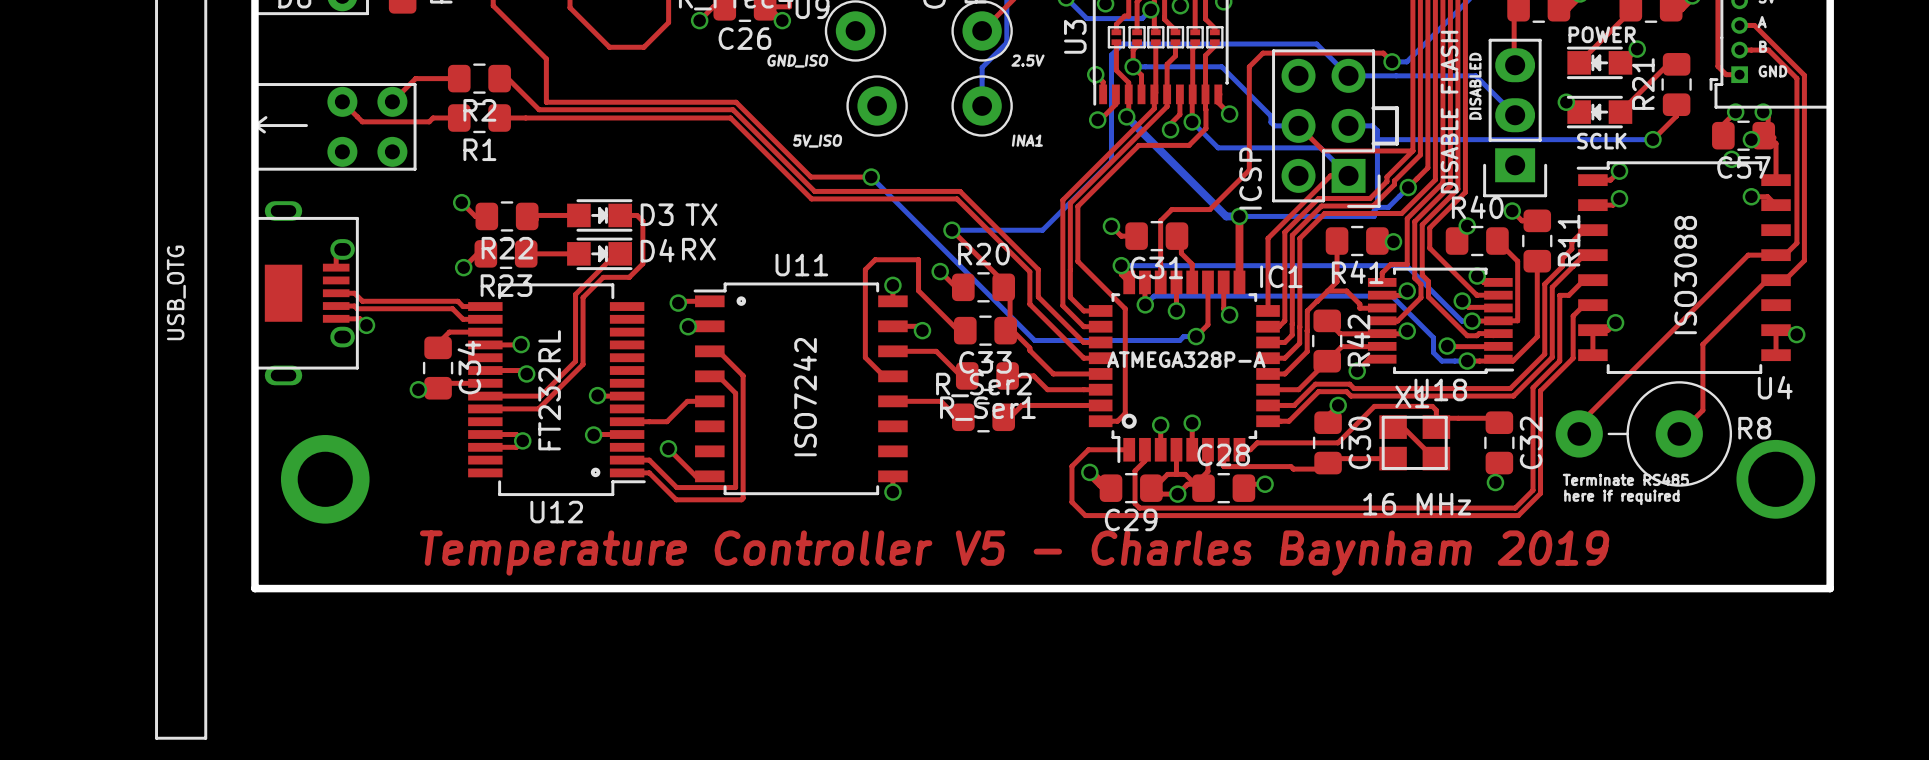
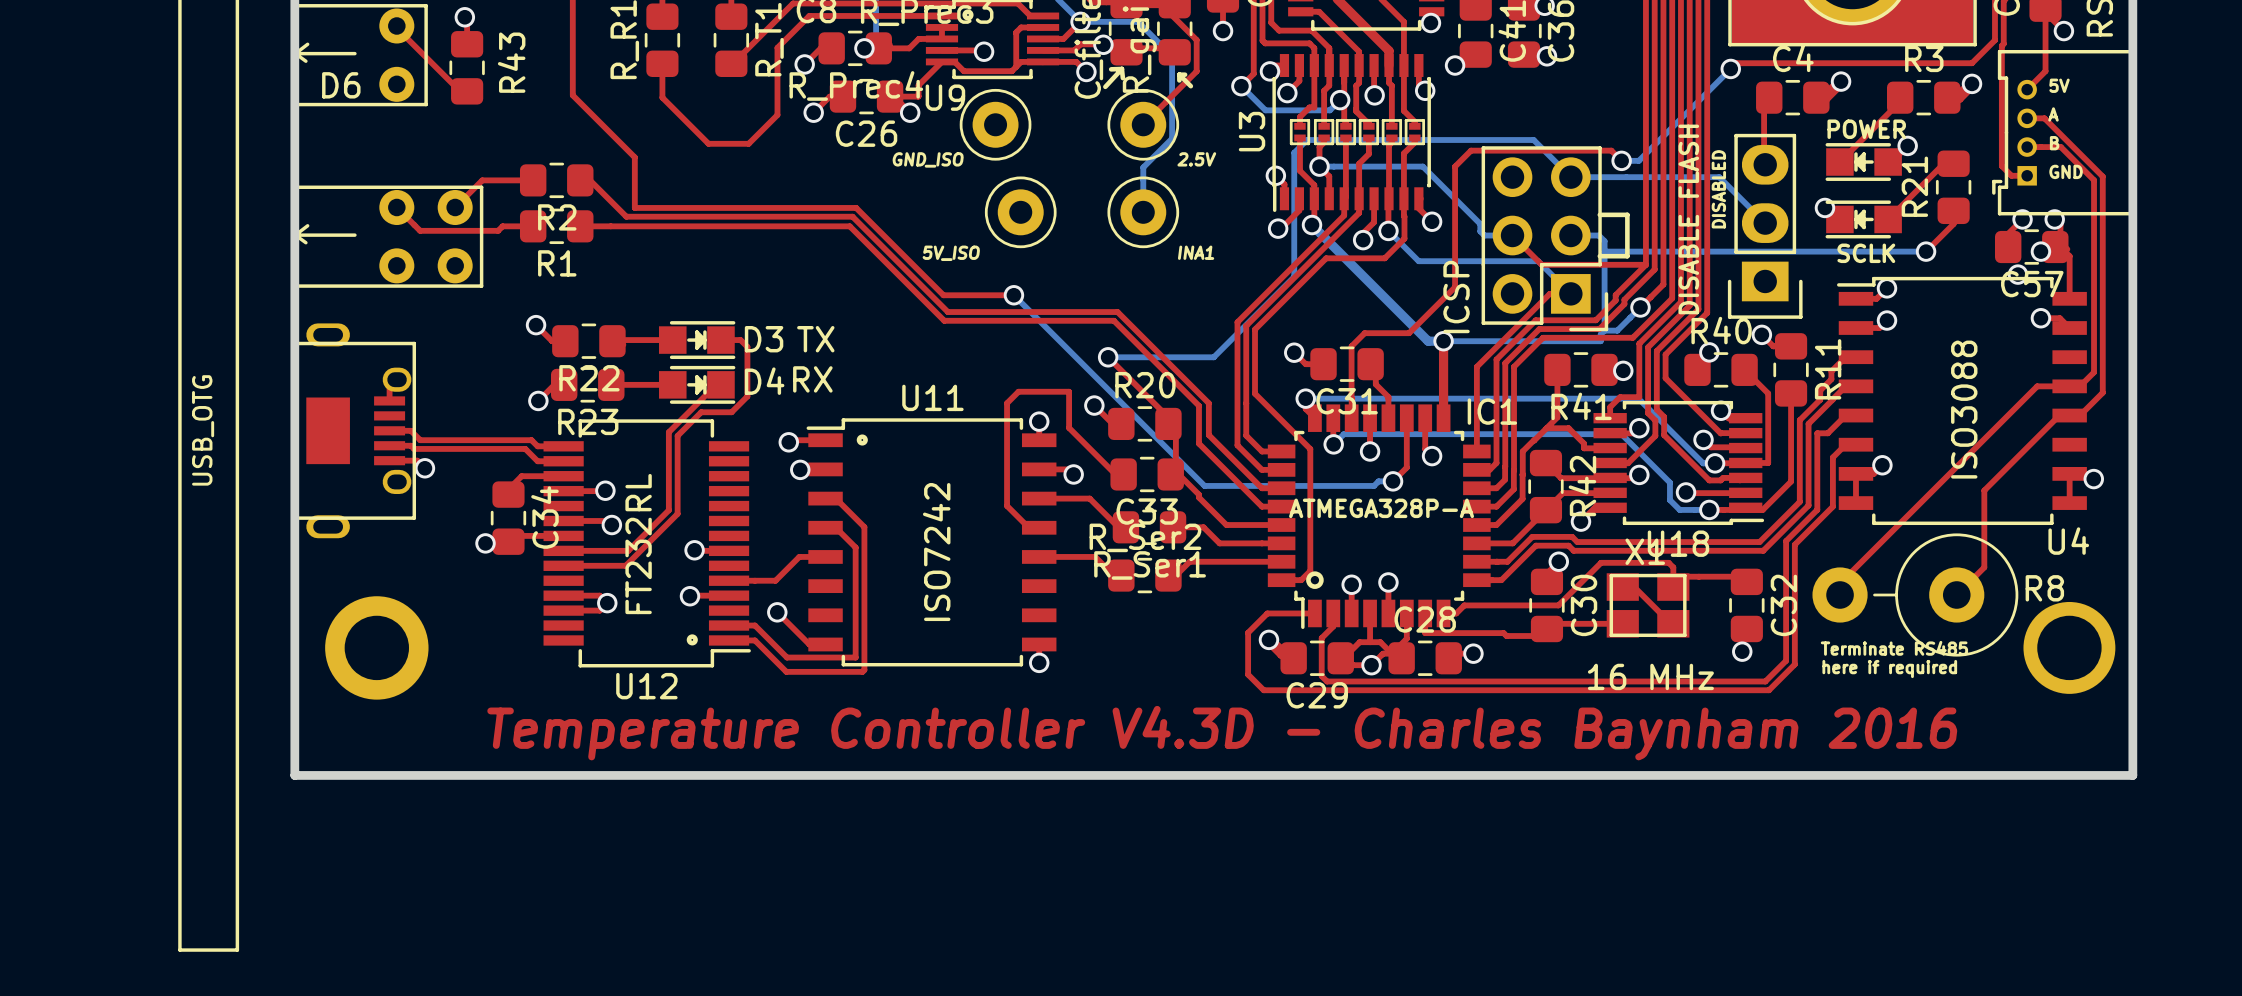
text: Temperature Controller V5 - Charles Baynham 2019 (1014, 553) -> Temperature Controller V4.3D - Charles Baynham 2016 (1222, 733)

